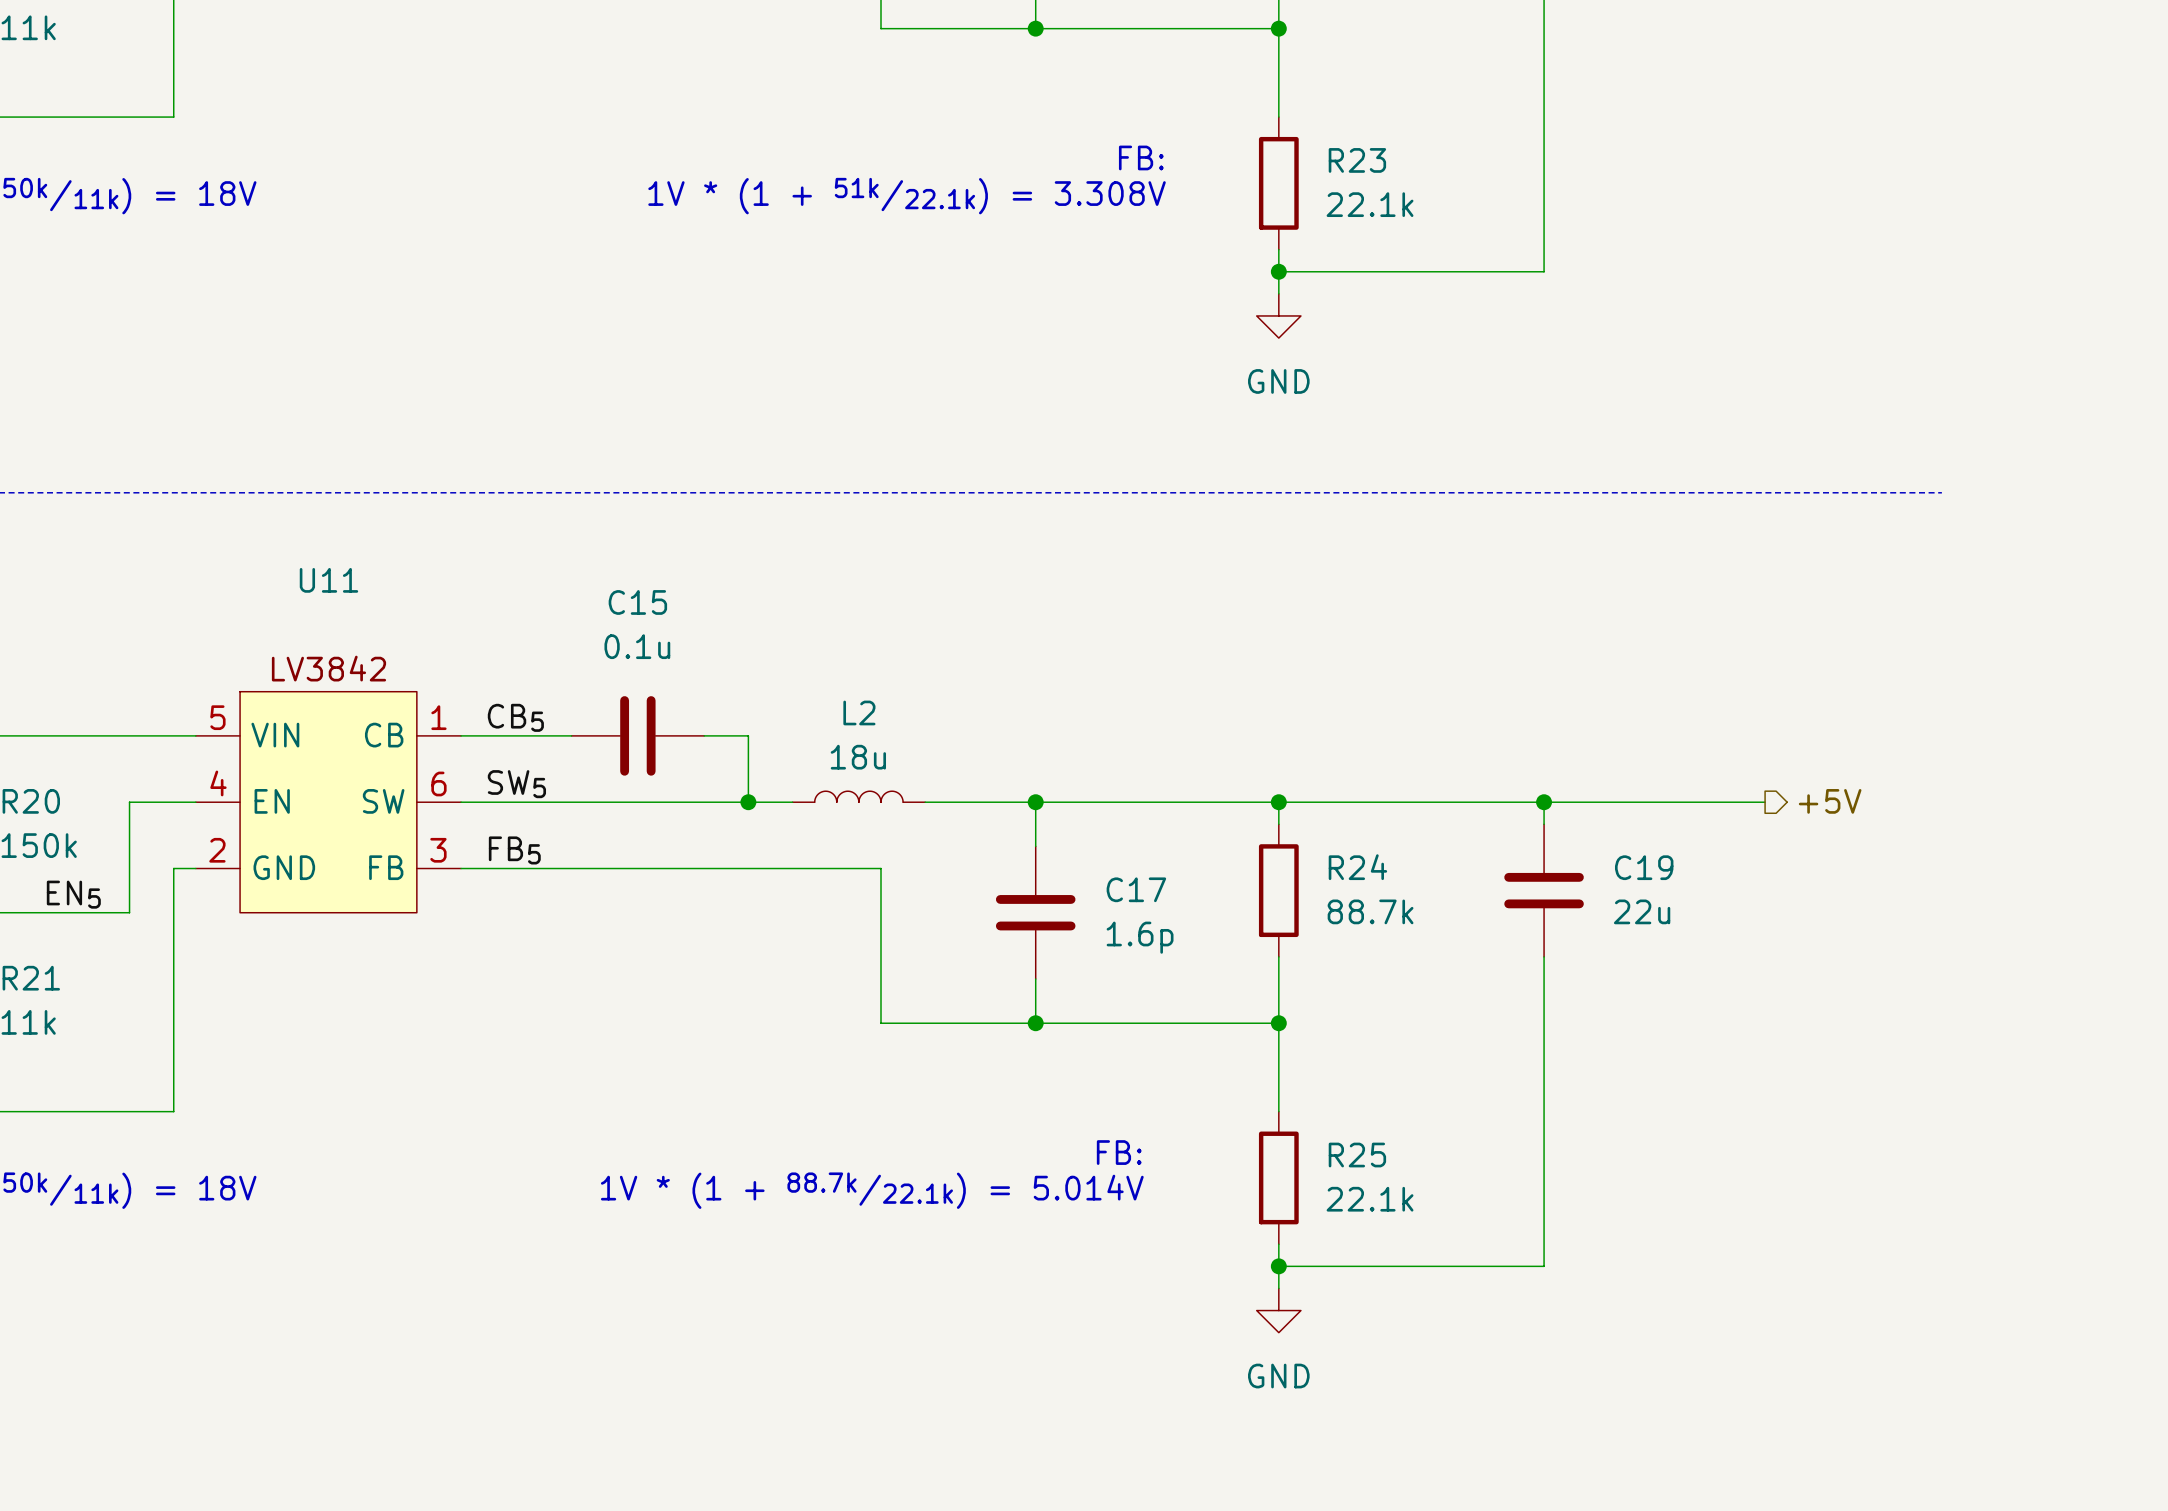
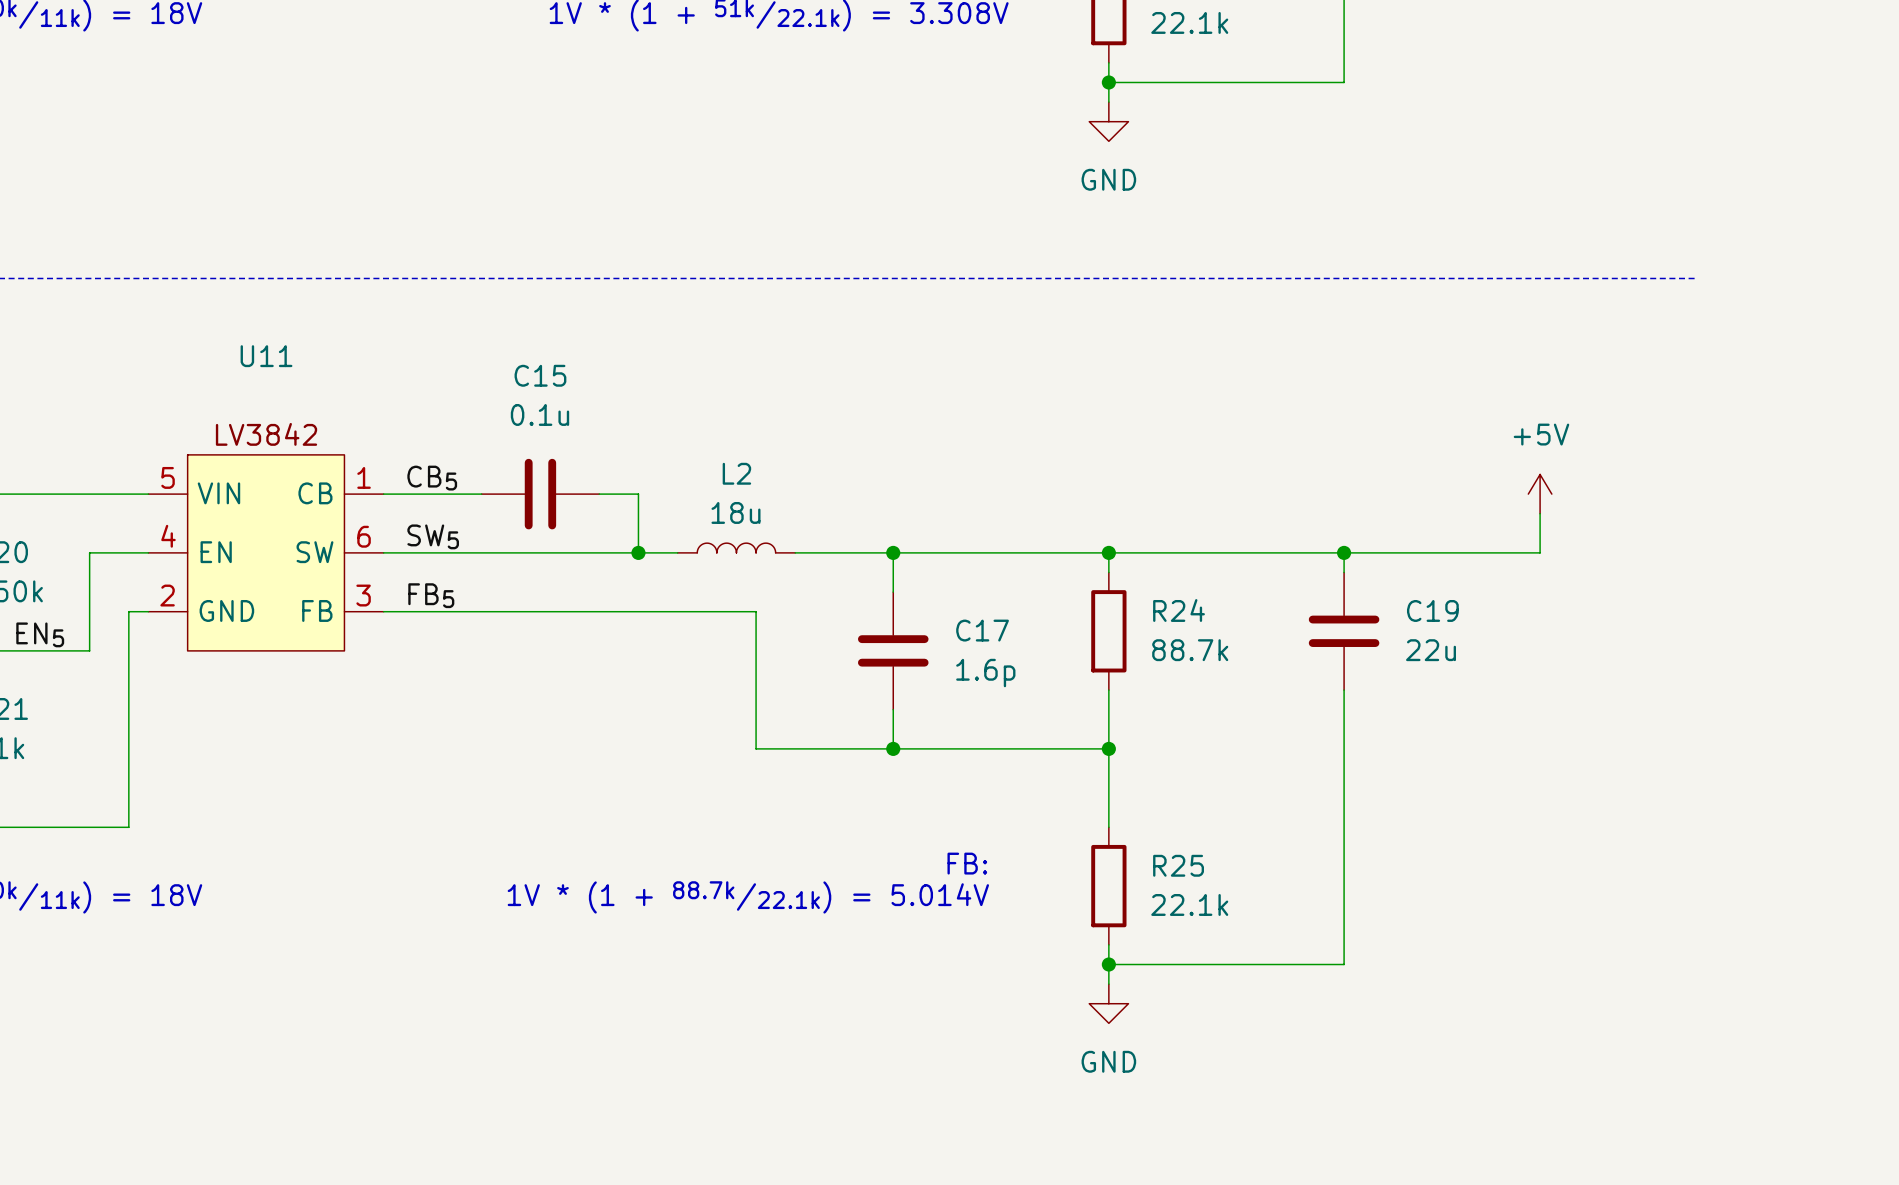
power symbol: none -> +5V (1540, 494)
wire: none -> (1540, 513) (1540, 552)
hierarchical label: +5V (1830, 801) -> none

